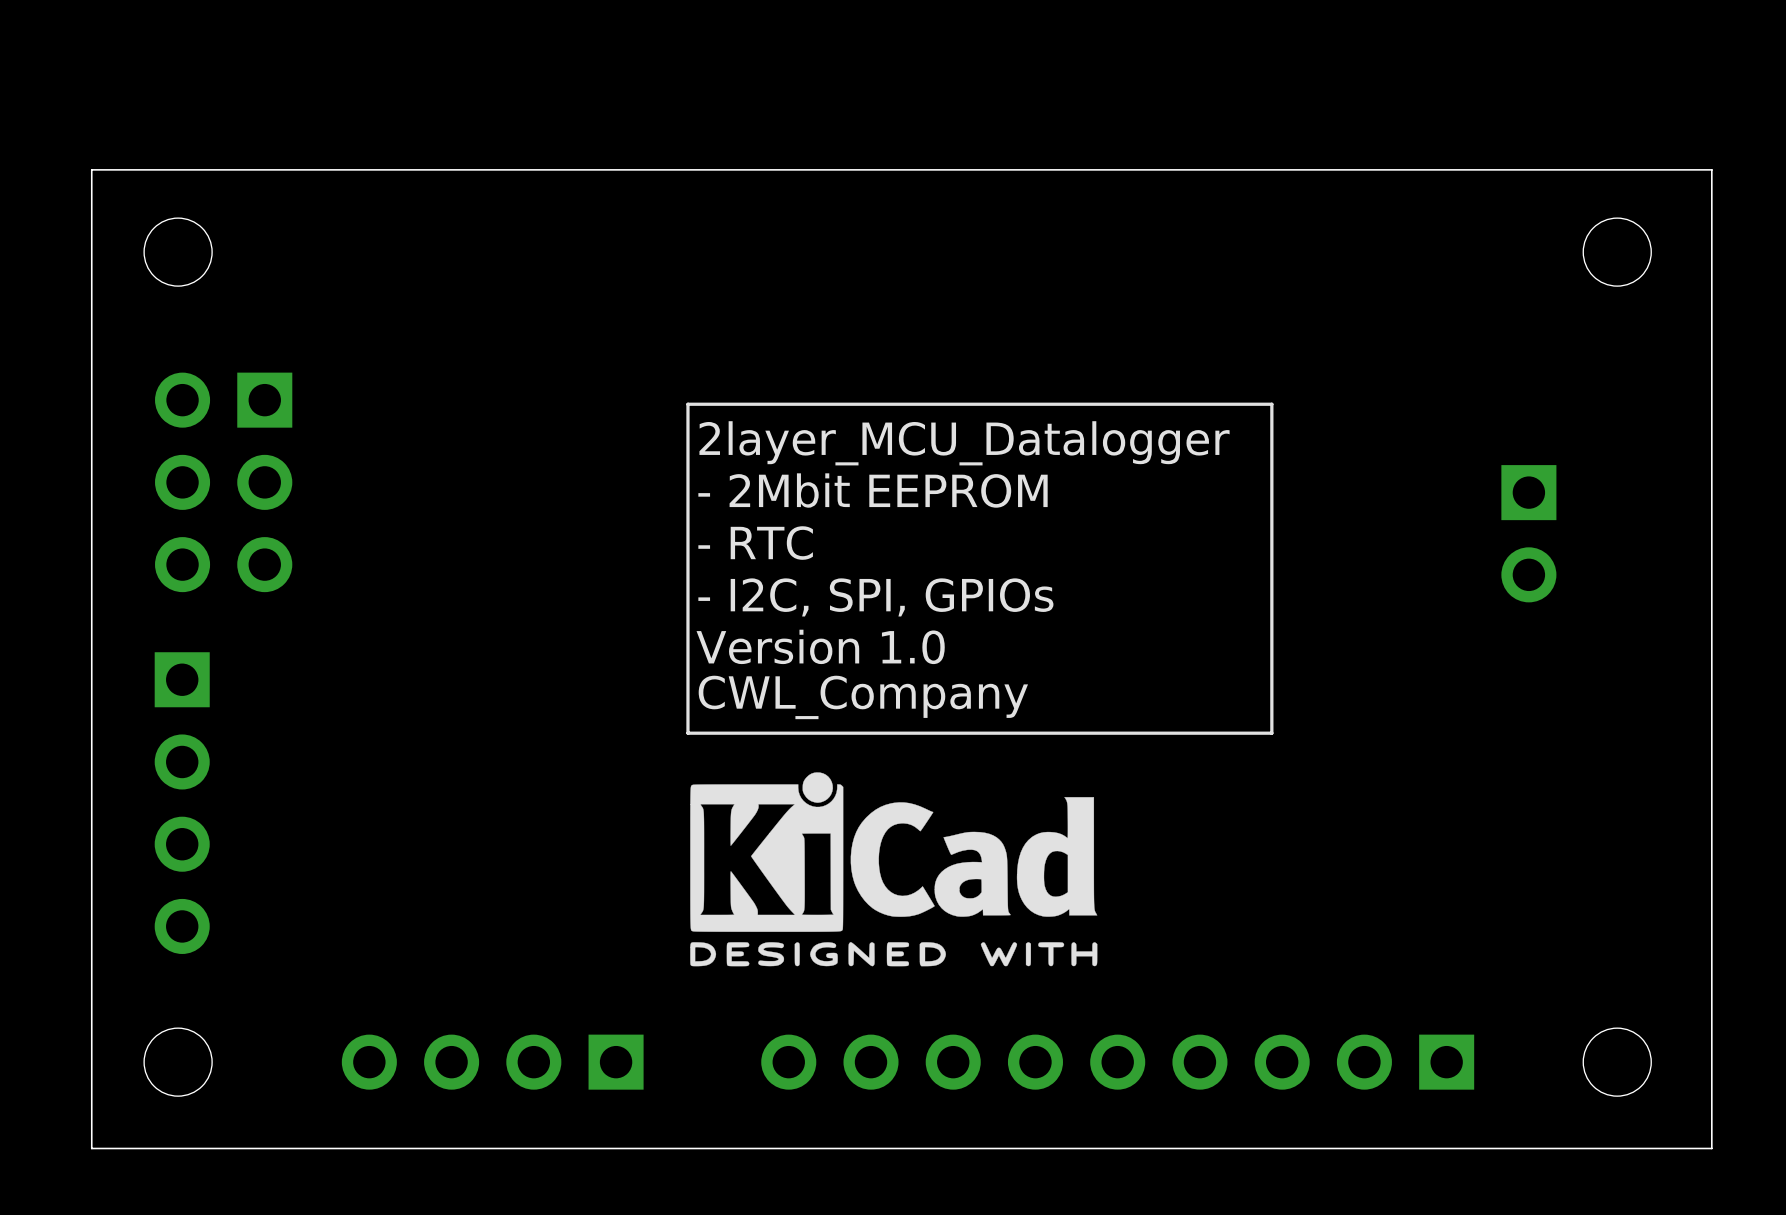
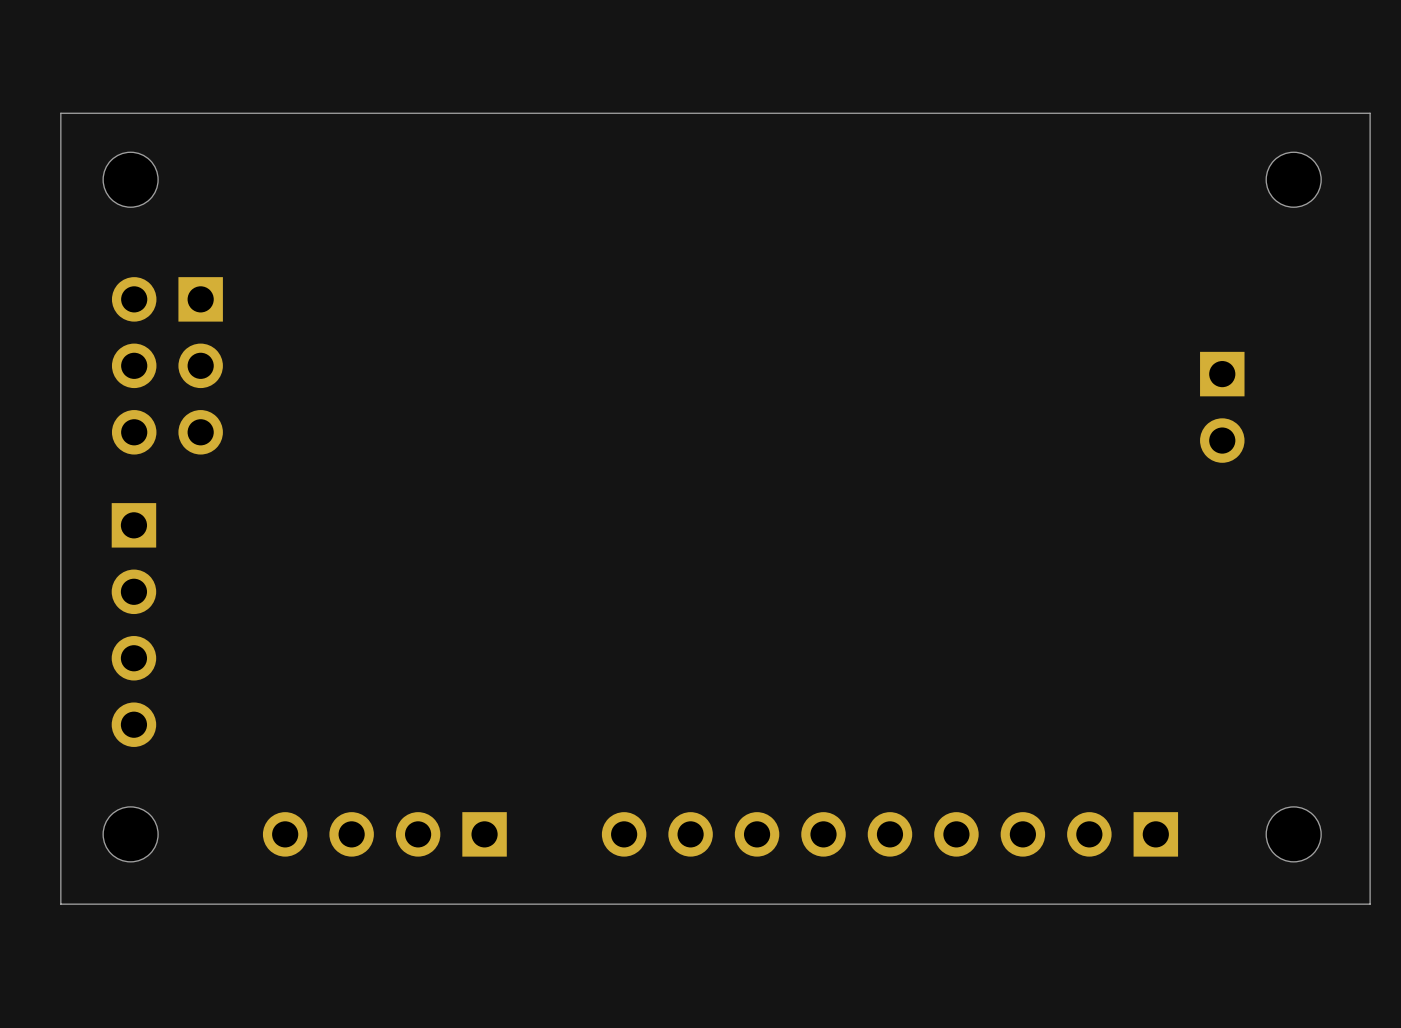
line: (1271, 404) (687, 404) (687, 733) (1271, 733) (1271, 404) -> none
text: 2layer_MCU_Datalogger (964, 443) -> none
text: - 2Mbit EEPROM (873, 490) -> none
text: - RTC (755, 543) -> none
text: - I2C, SPI, GPIOs (875, 597) -> none
text: Version 1.0 (820, 646) -> none
text: CWL_Company (863, 697) -> none
drawing: [690, 772, 1098, 967] -> none

